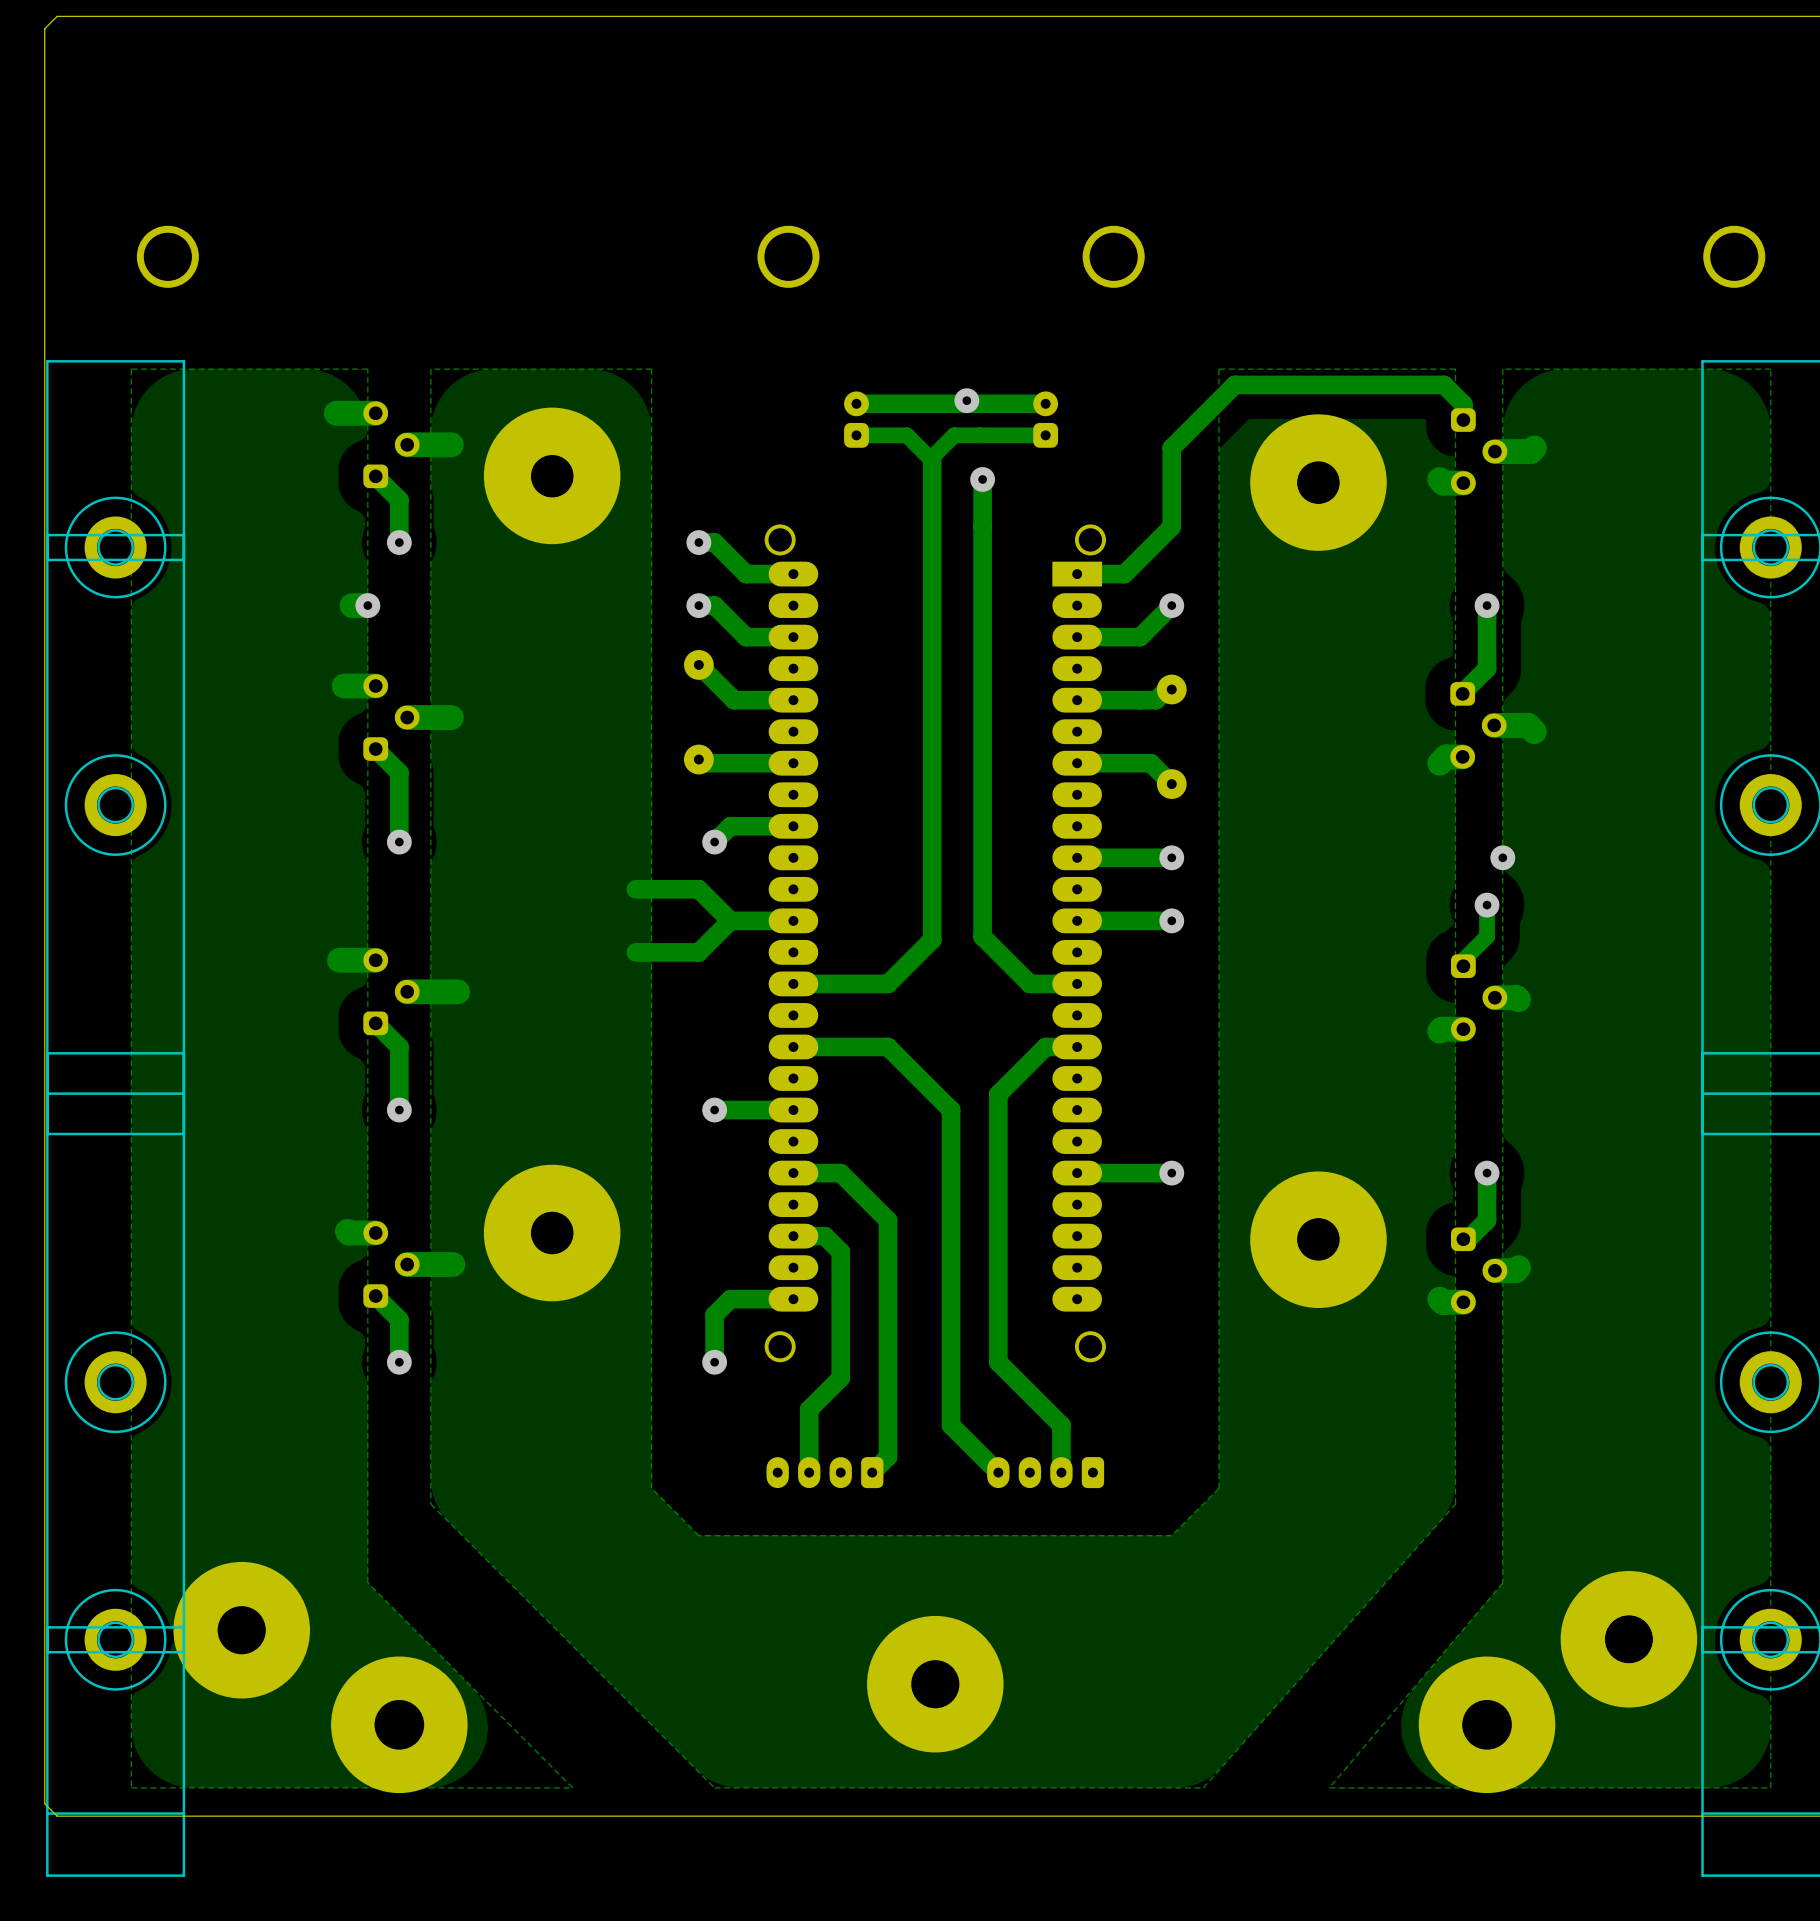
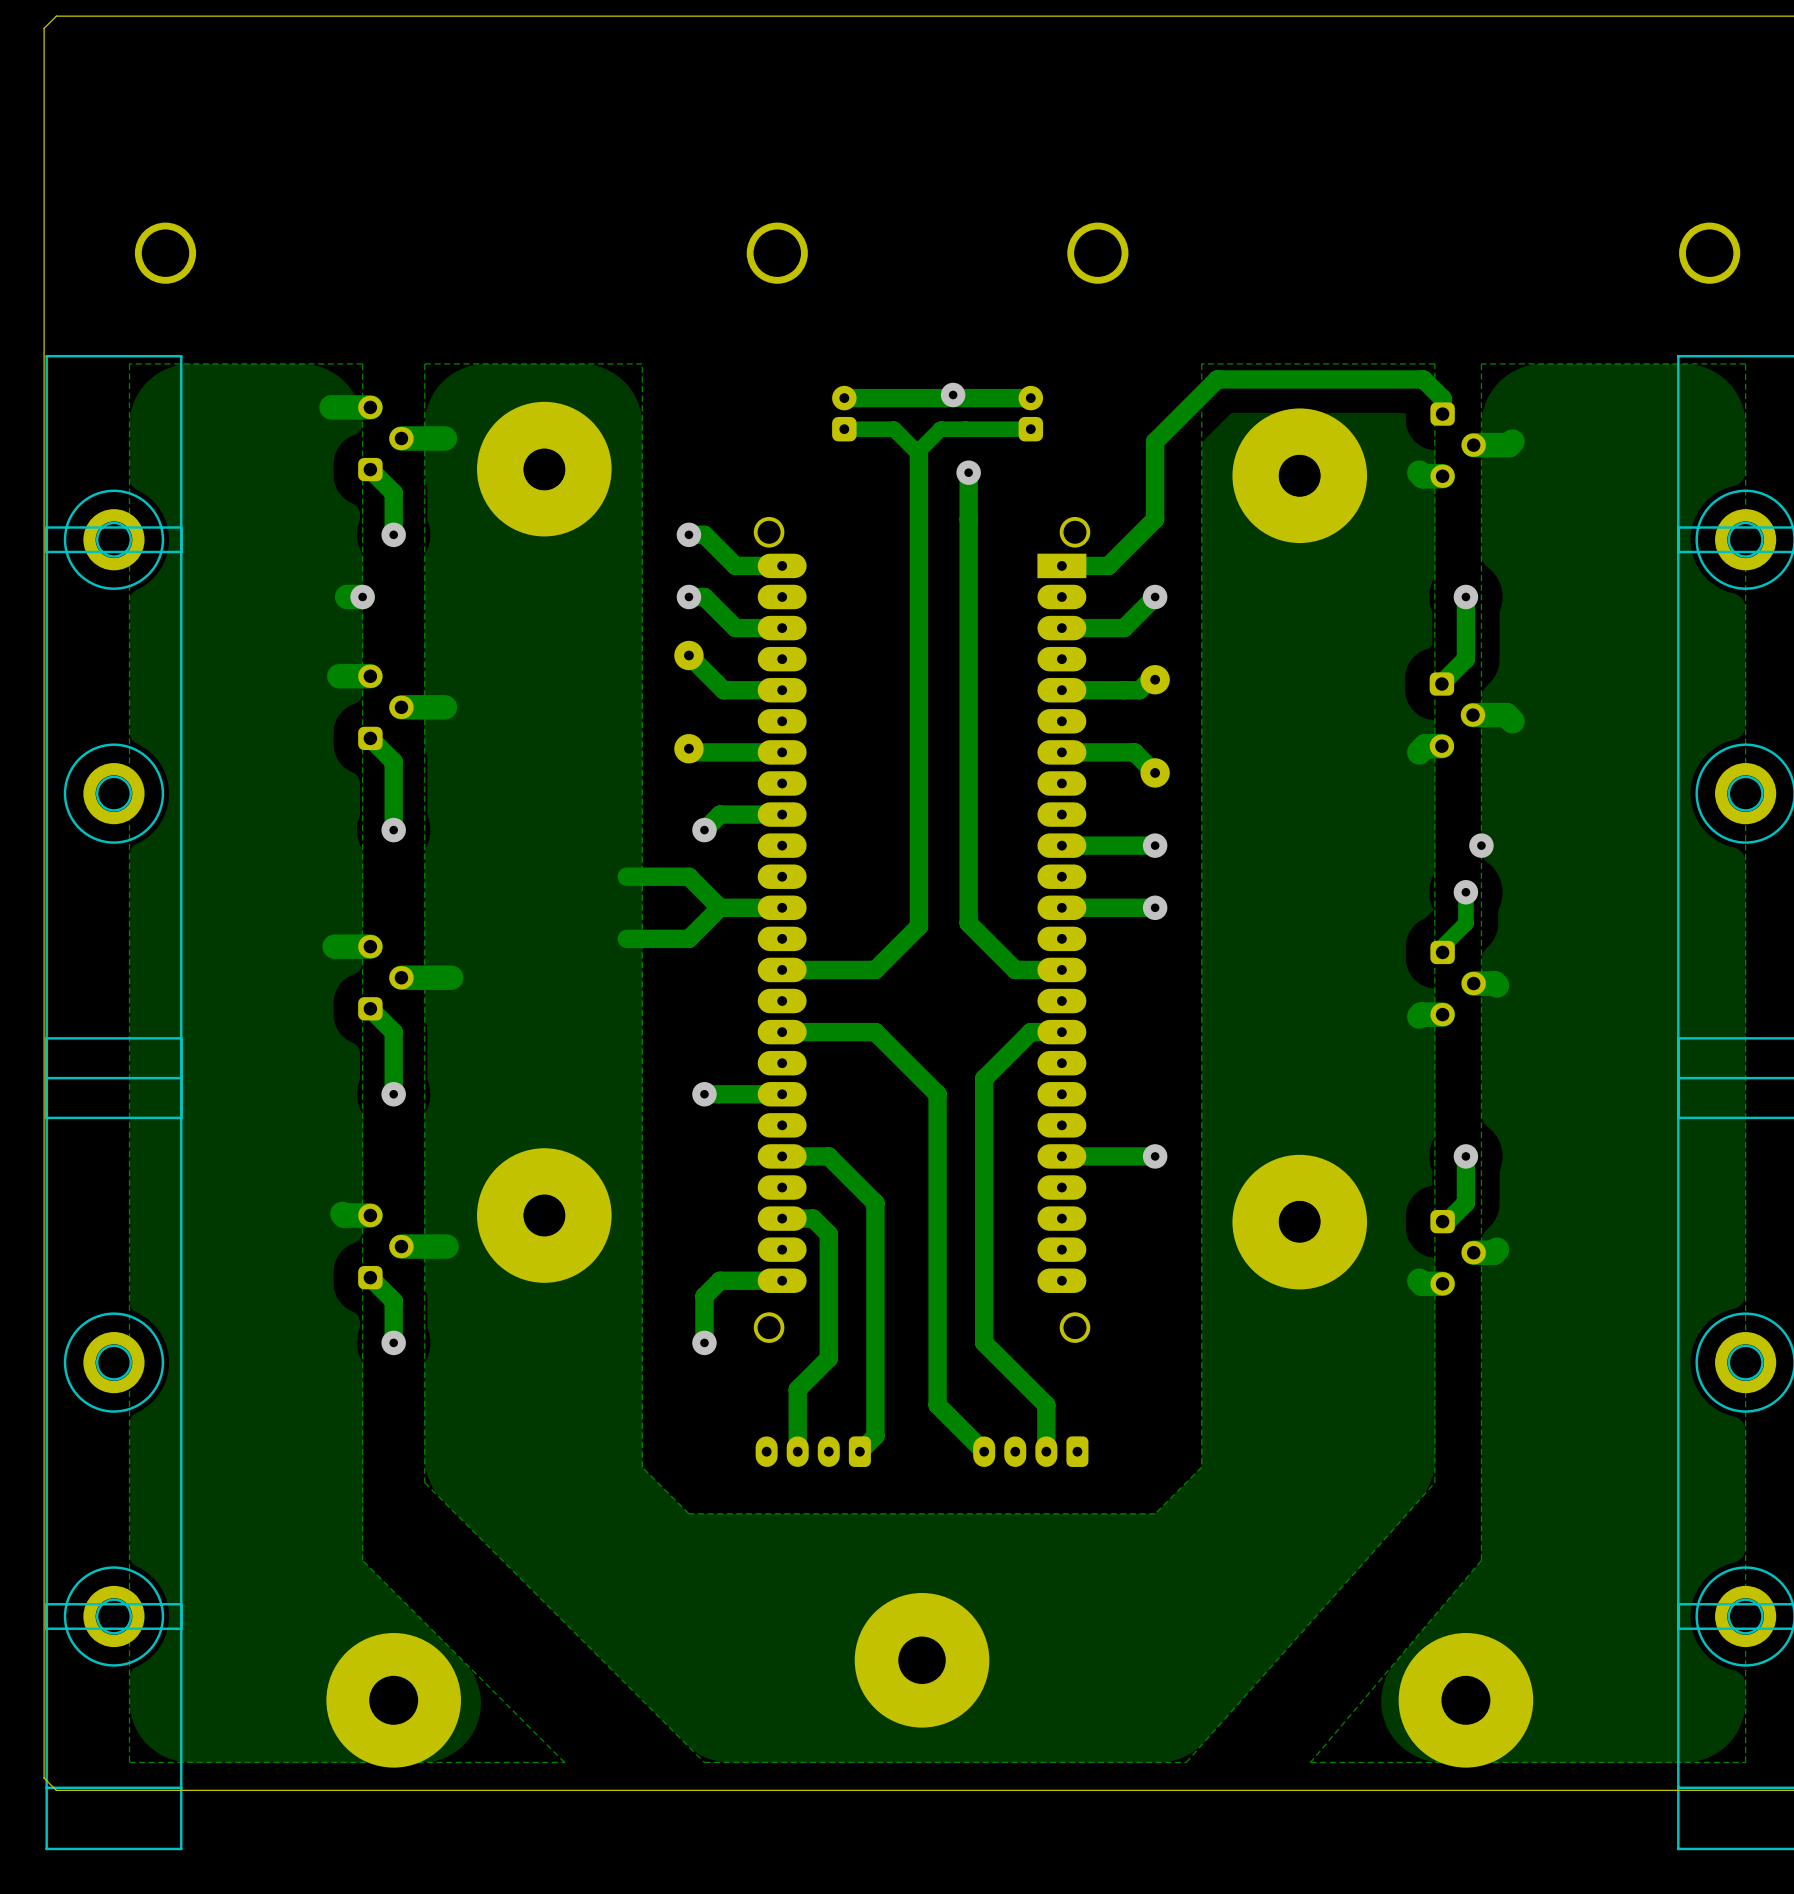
part: (241, 1630) -> none
part: (1628, 1639) -> none

